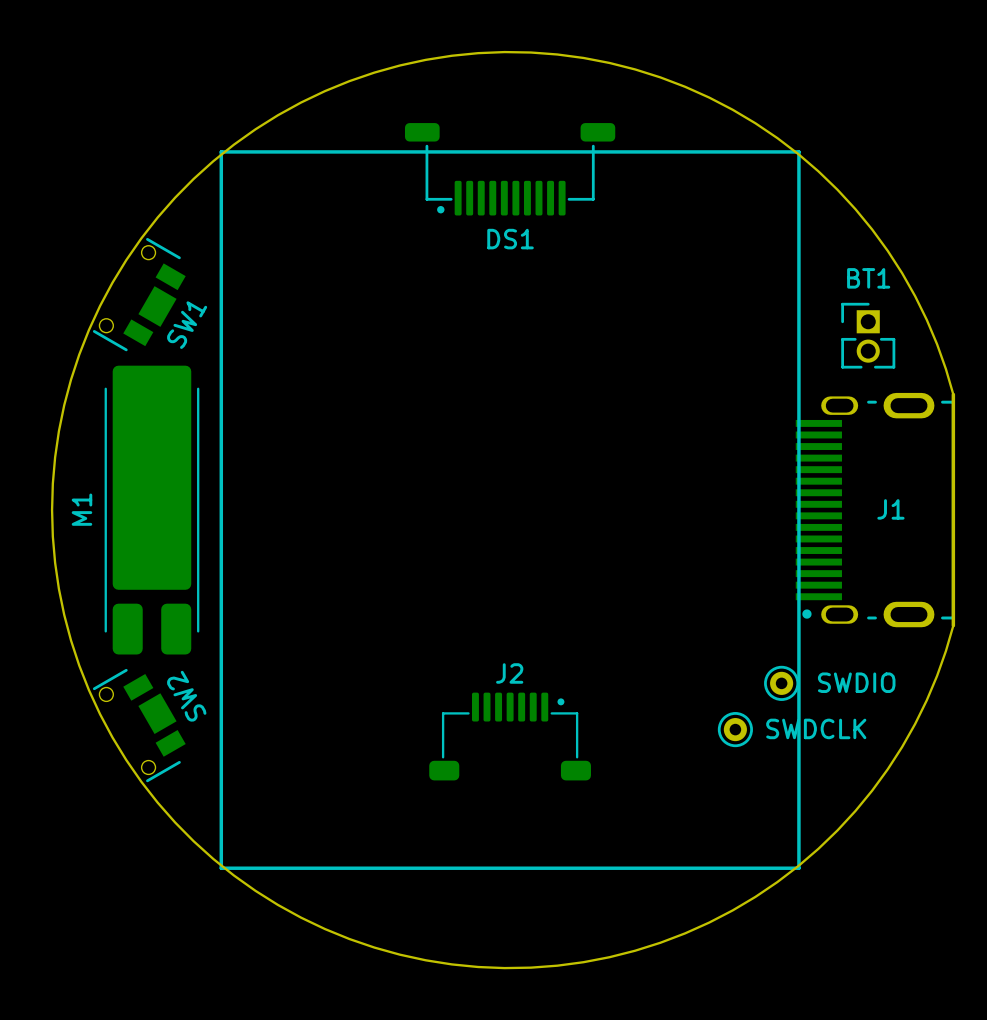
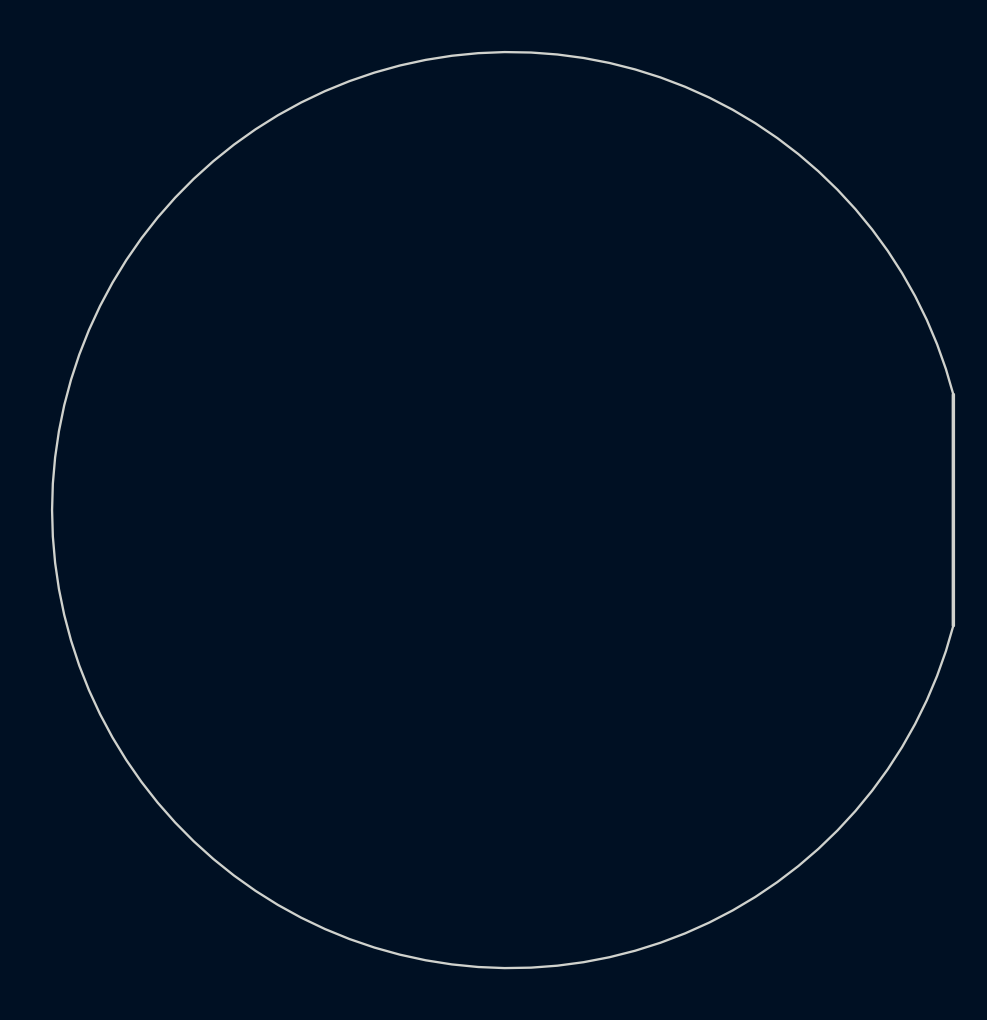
line: (798, 151) (221, 151) (221, 868) (798, 868) (798, 151) -> none
DS1: (510, 169) -> none
SW1: (139, 294) -> none
BT1: (868, 335) -> none
M1: (151, 510) -> none
J1: (875, 510) -> none
part: SWDIO (781, 683) -> none
SW2: (139, 725) -> none
part: SWDCLK (735, 729) -> none
J2: (510, 736) -> none

